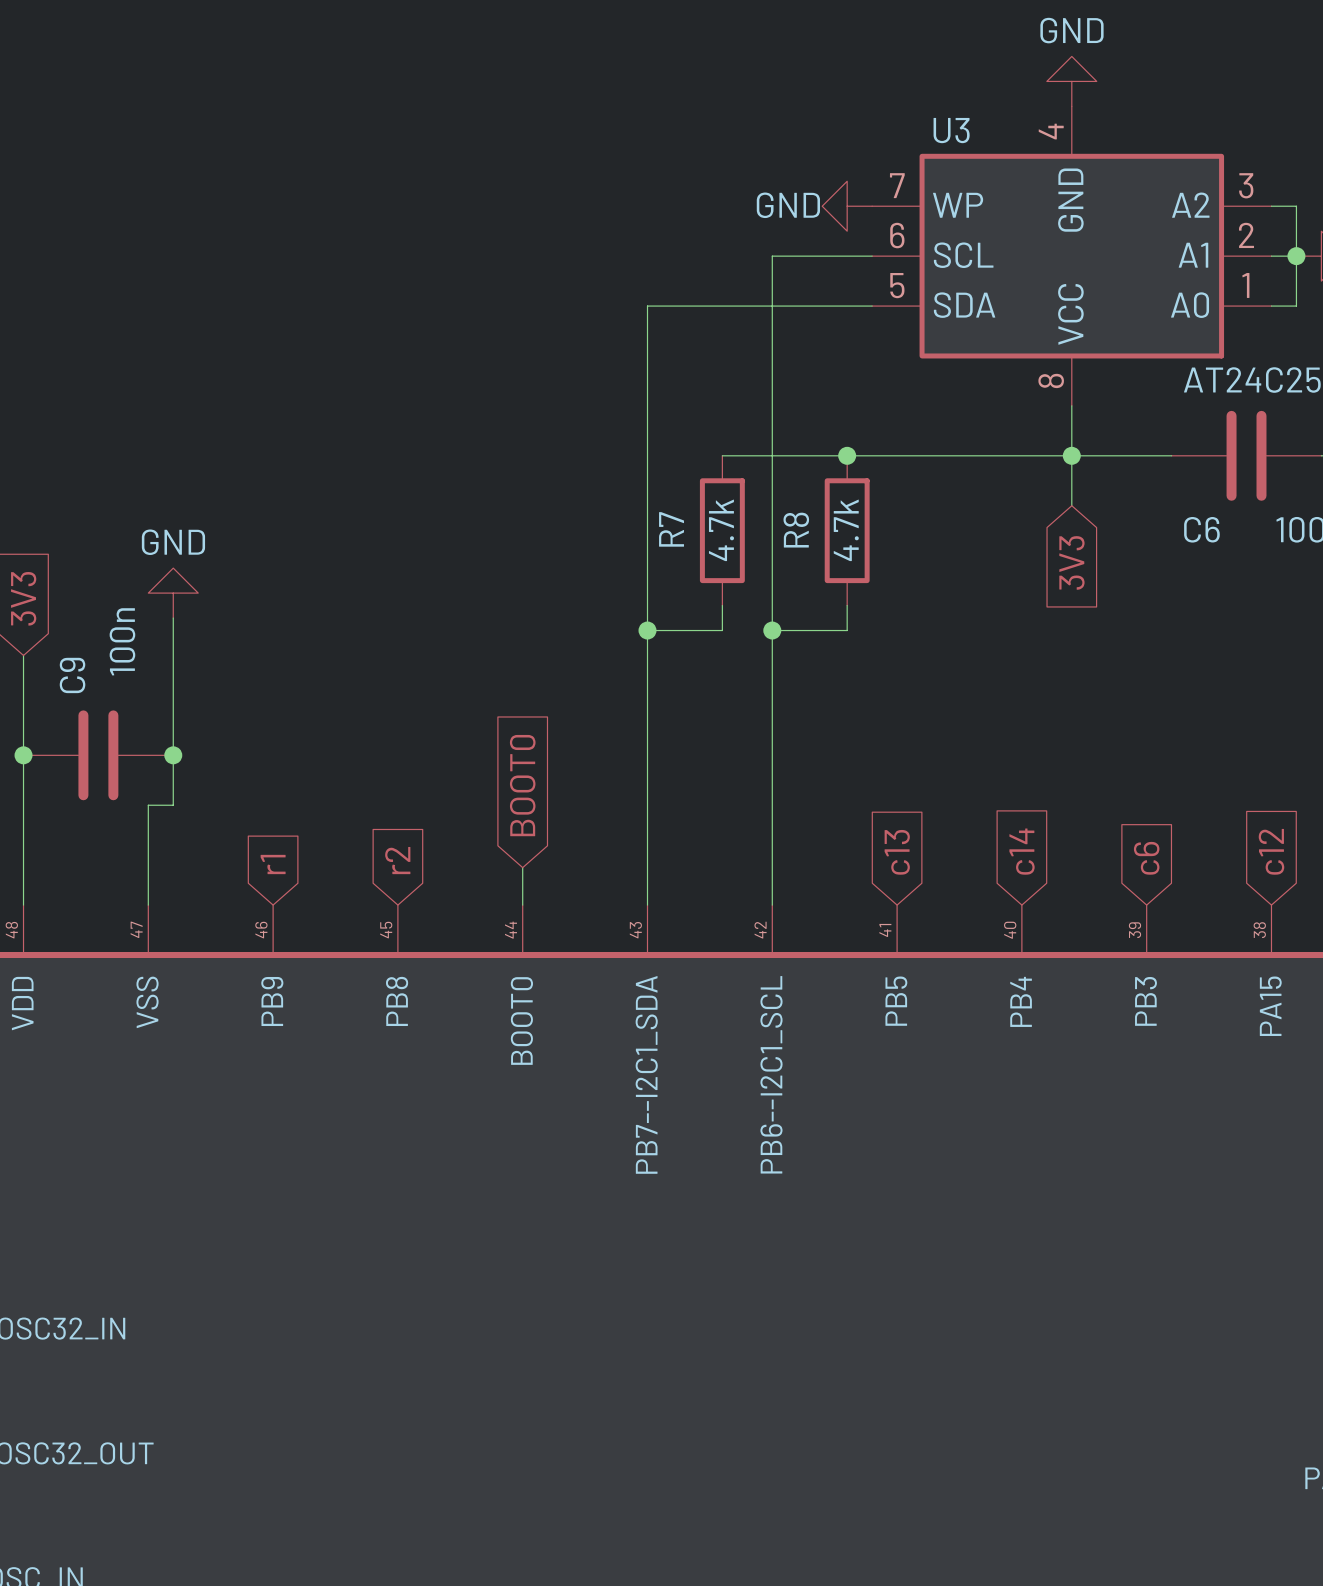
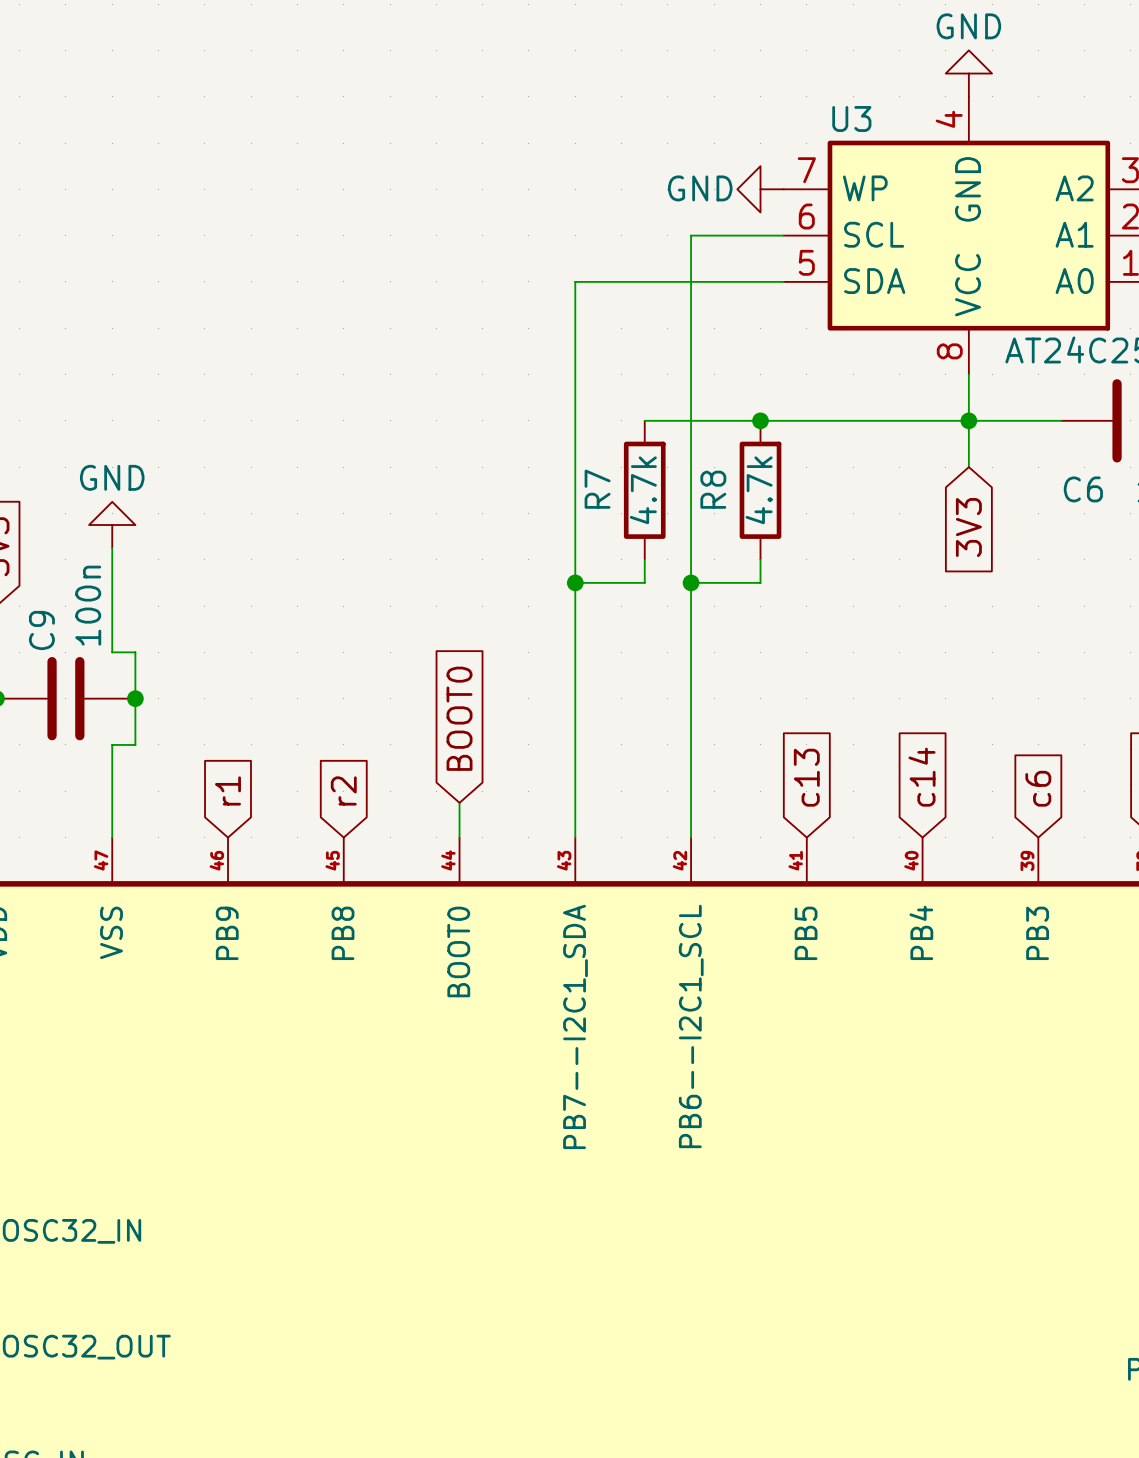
power symbol position: GND (173, 593) -> GND (112, 525)
wire: (173, 618) (173, 705) -> (112, 548) (112, 652) (135, 652)

